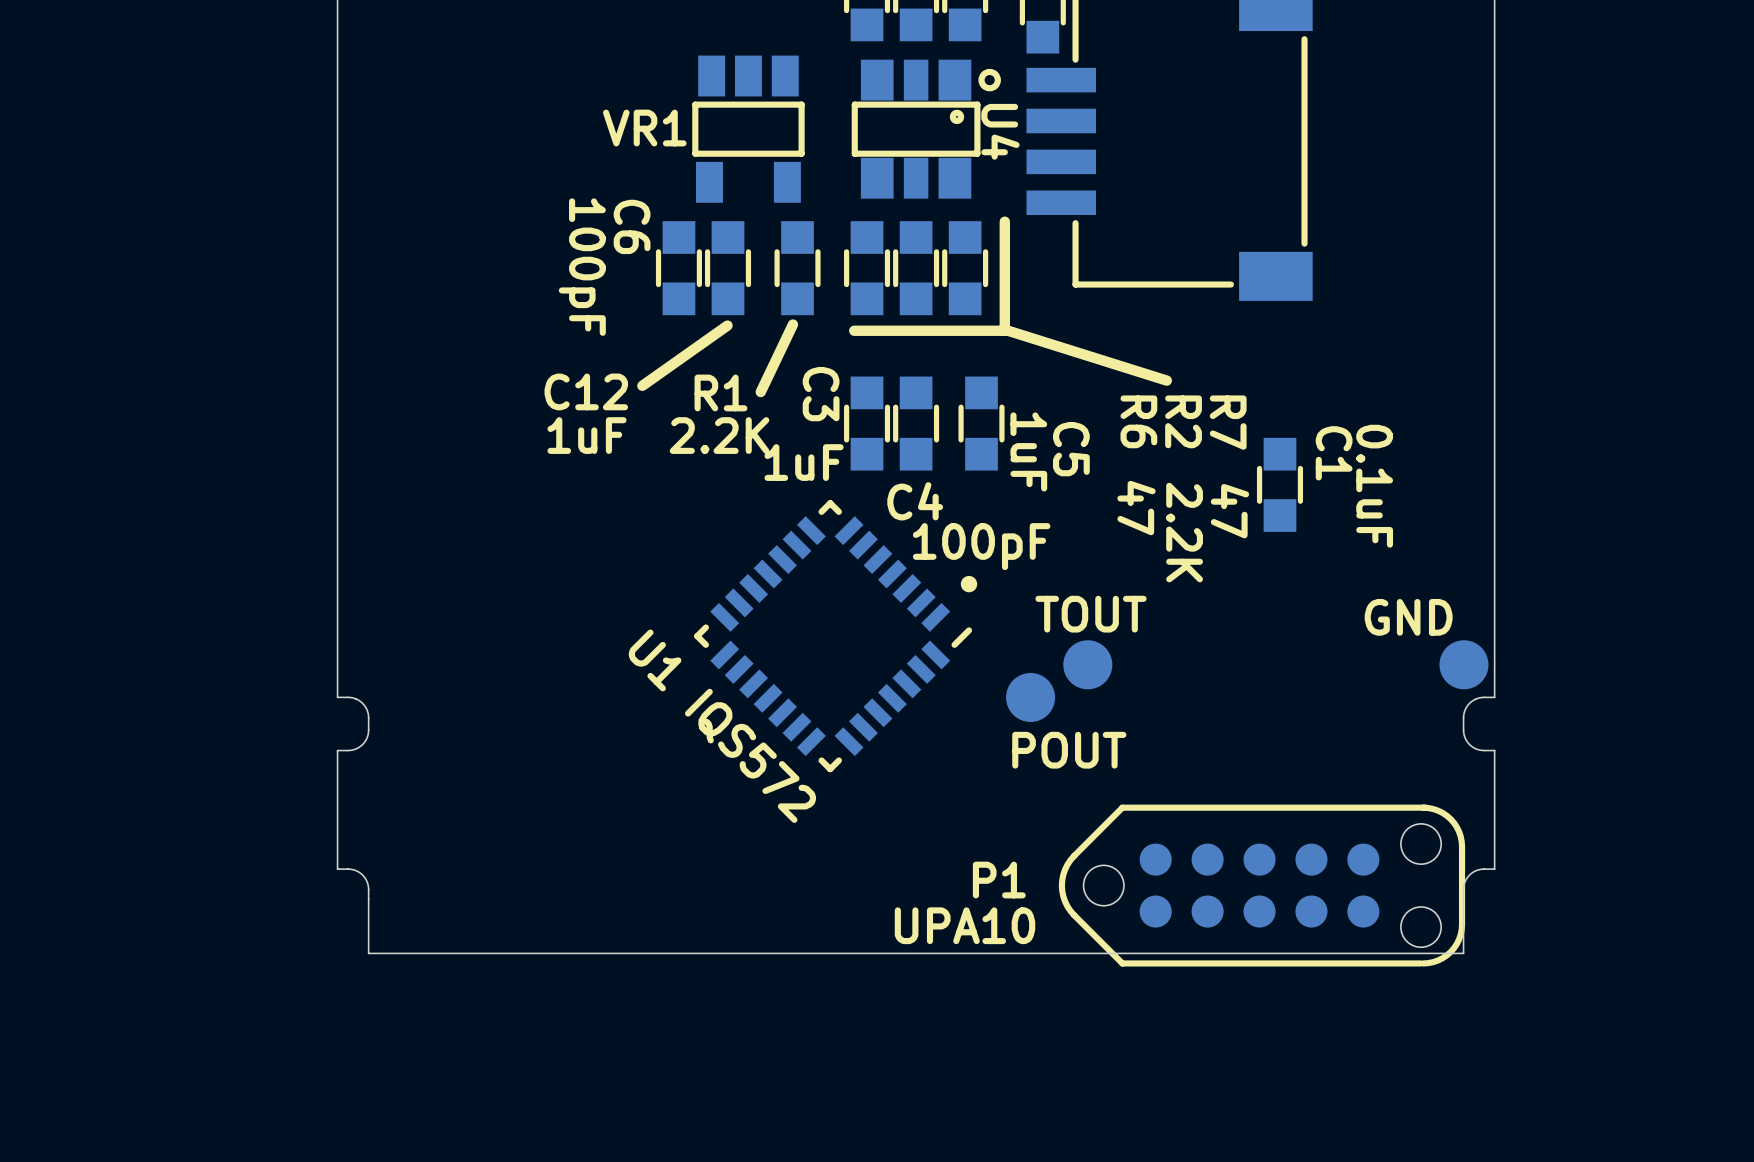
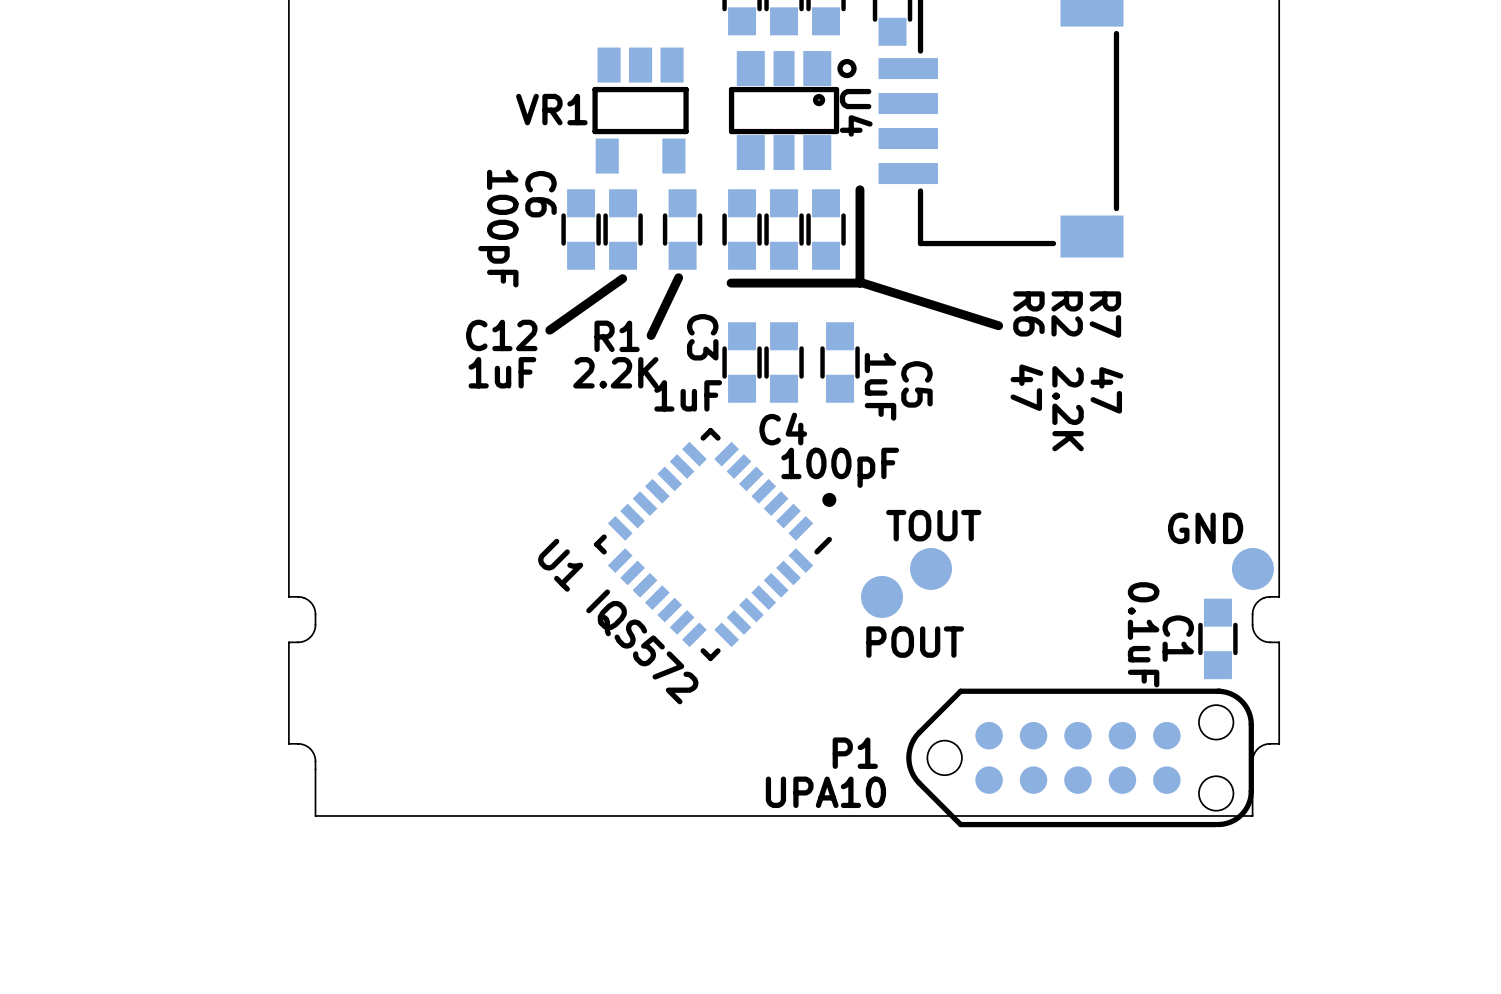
R6 name position: R6 (1138, 421) -> R6 (1028, 313)
R2 name position: R2 (1183, 421) -> R2 (1067, 313)
R7 name position: R7 (1228, 422) -> R7 (1105, 314)
C1 name position: C1 (1334, 453) -> C1 (1178, 638)
C1 position: (1279, 484) -> (1217, 638)
C1 value position: 0.1uF (1374, 486) -> 0.1uF (1143, 634)
R6 value position: 47 (1136, 508) -> 47 (1026, 387)
R7 value position: 47 (1229, 511) -> 47 (1106, 390)
R2 value position: 2.2K (1184, 532) -> 2.2K (1068, 408)

